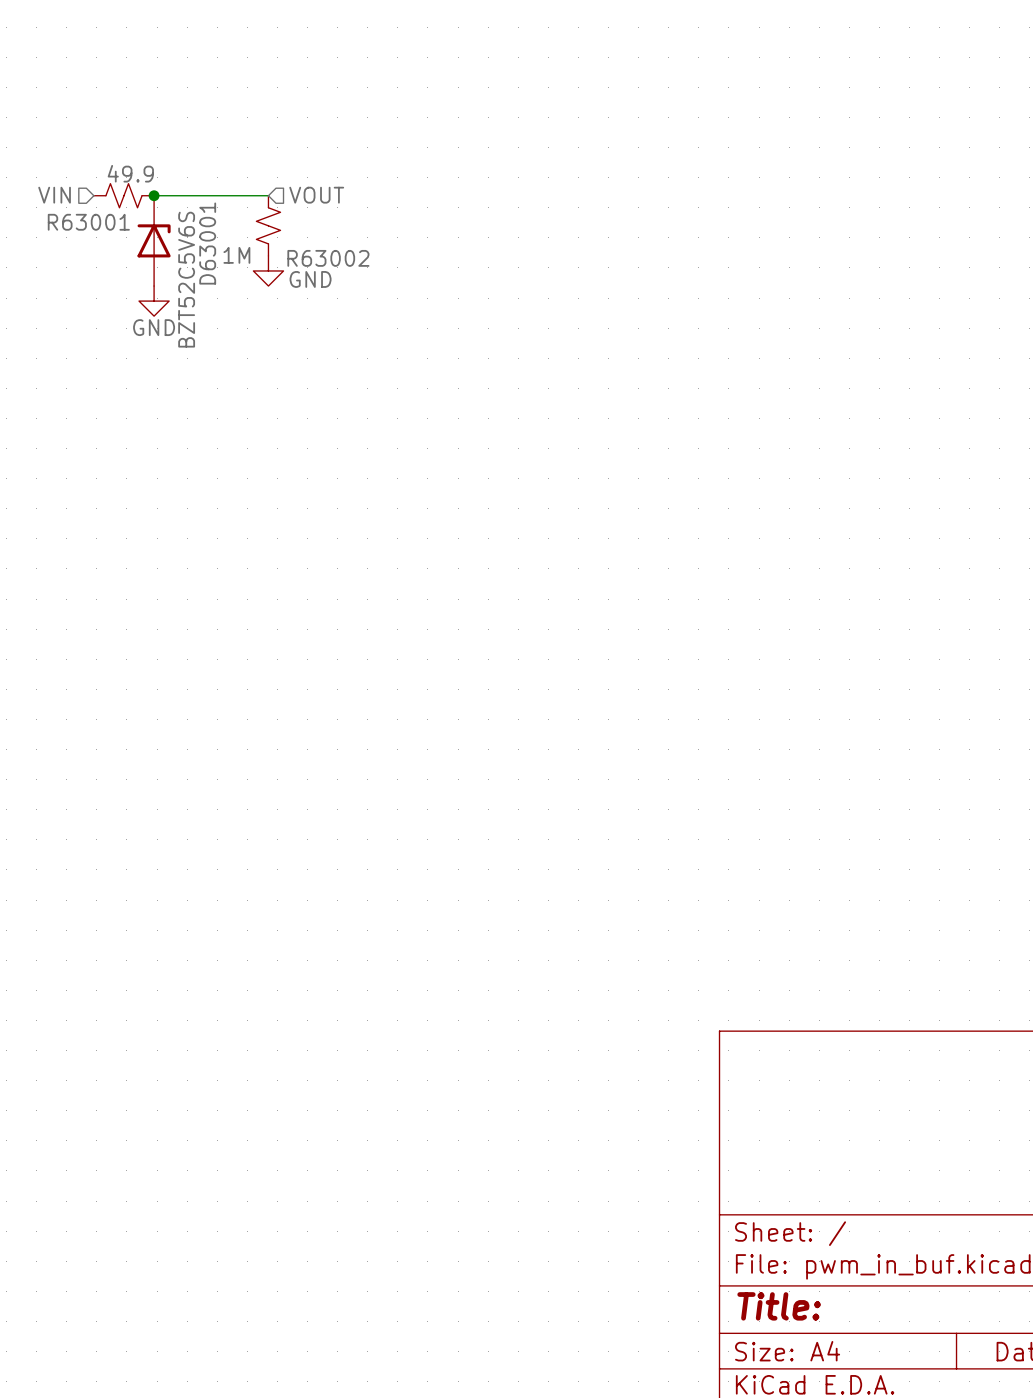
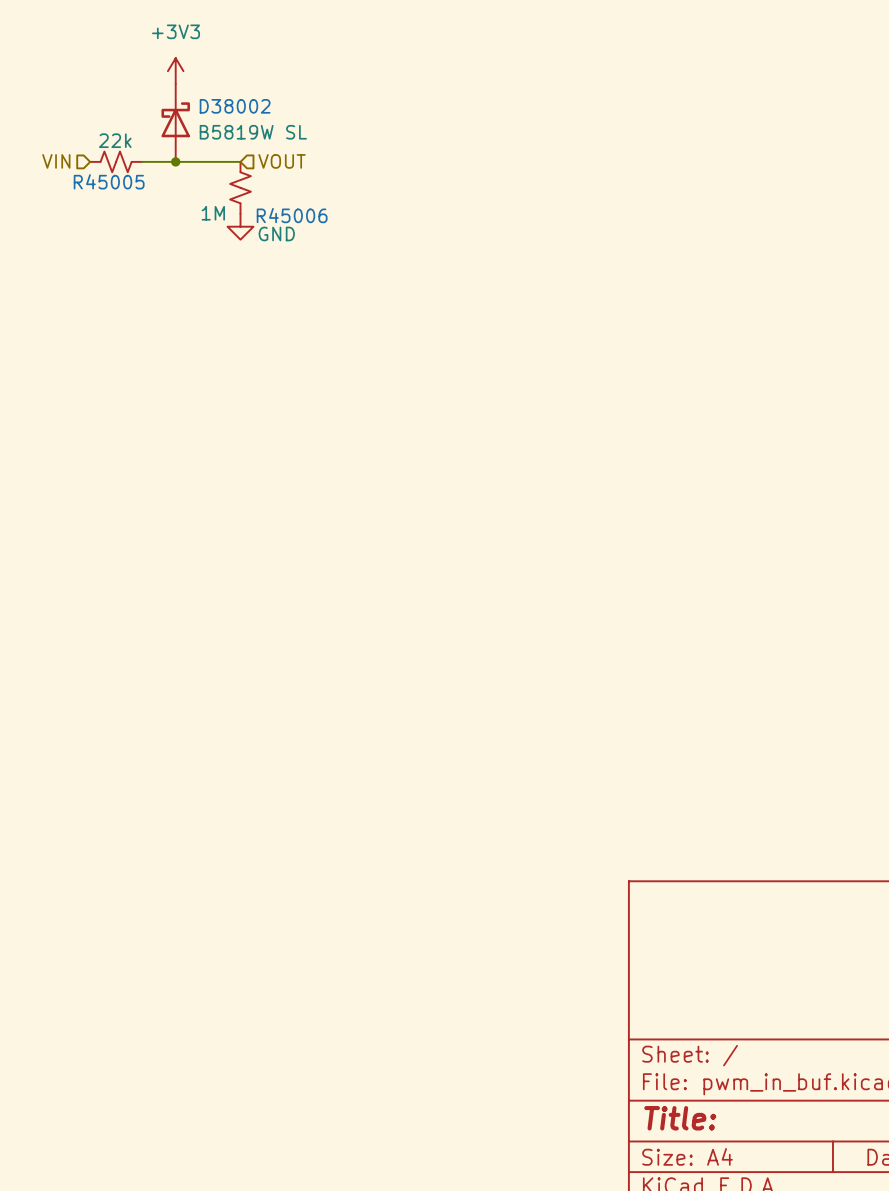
power symbol: none -> +3V3 (175, 71)
D38002: none -> B5819W SL (175, 123)
R63001 value: 49.9 (130, 173) -> 22k (115, 140)
junction position: (154, 195) -> (175, 161)
R63001 name: R63001 (88, 222) -> R45005 (109, 181)
D63001: BZT52C5V6S (154, 240) -> none
R63002 name: R63002 (328, 258) -> R45006 (292, 215)
power symbol: GND (154, 301) -> none

